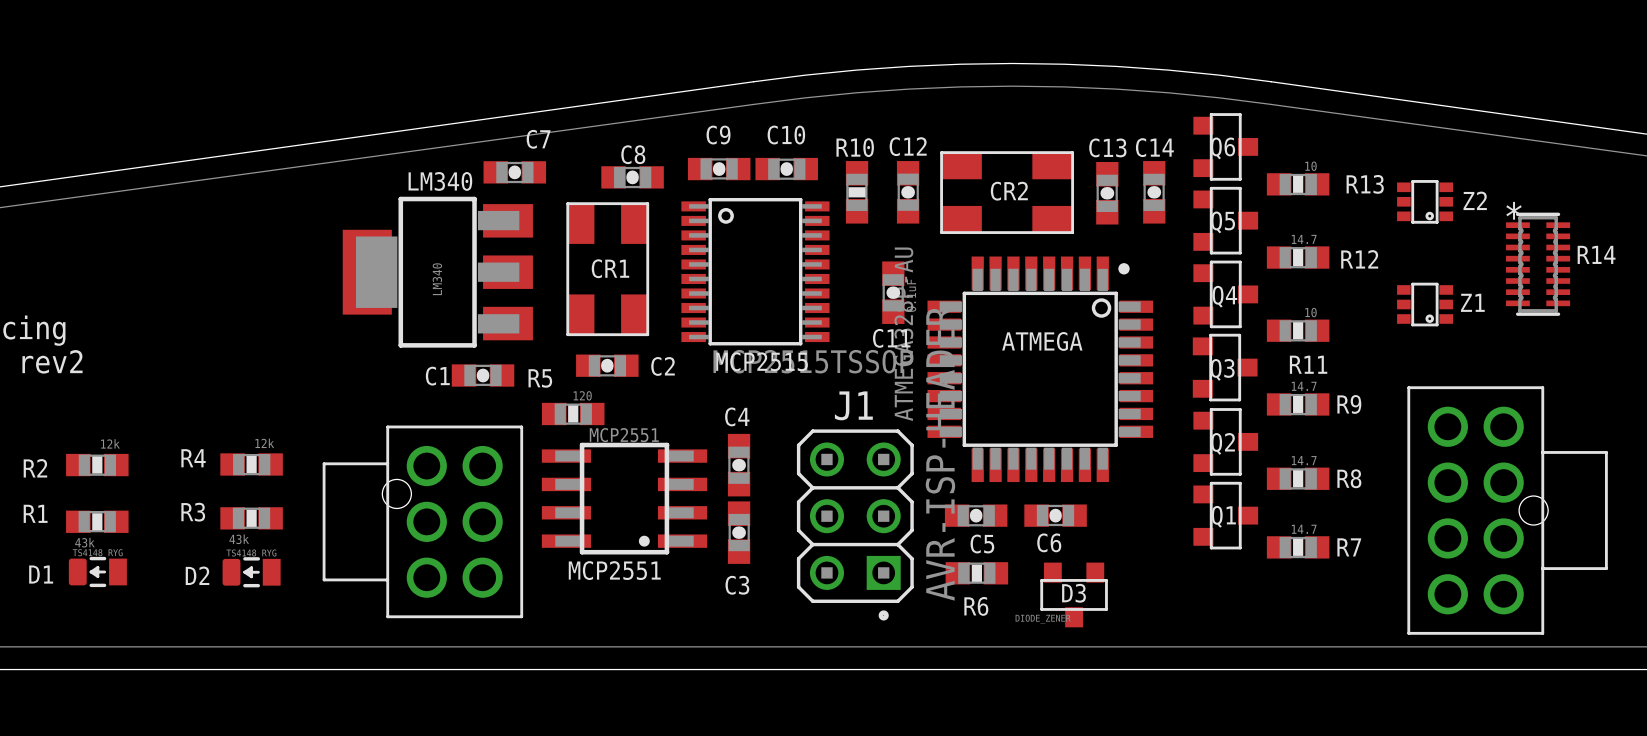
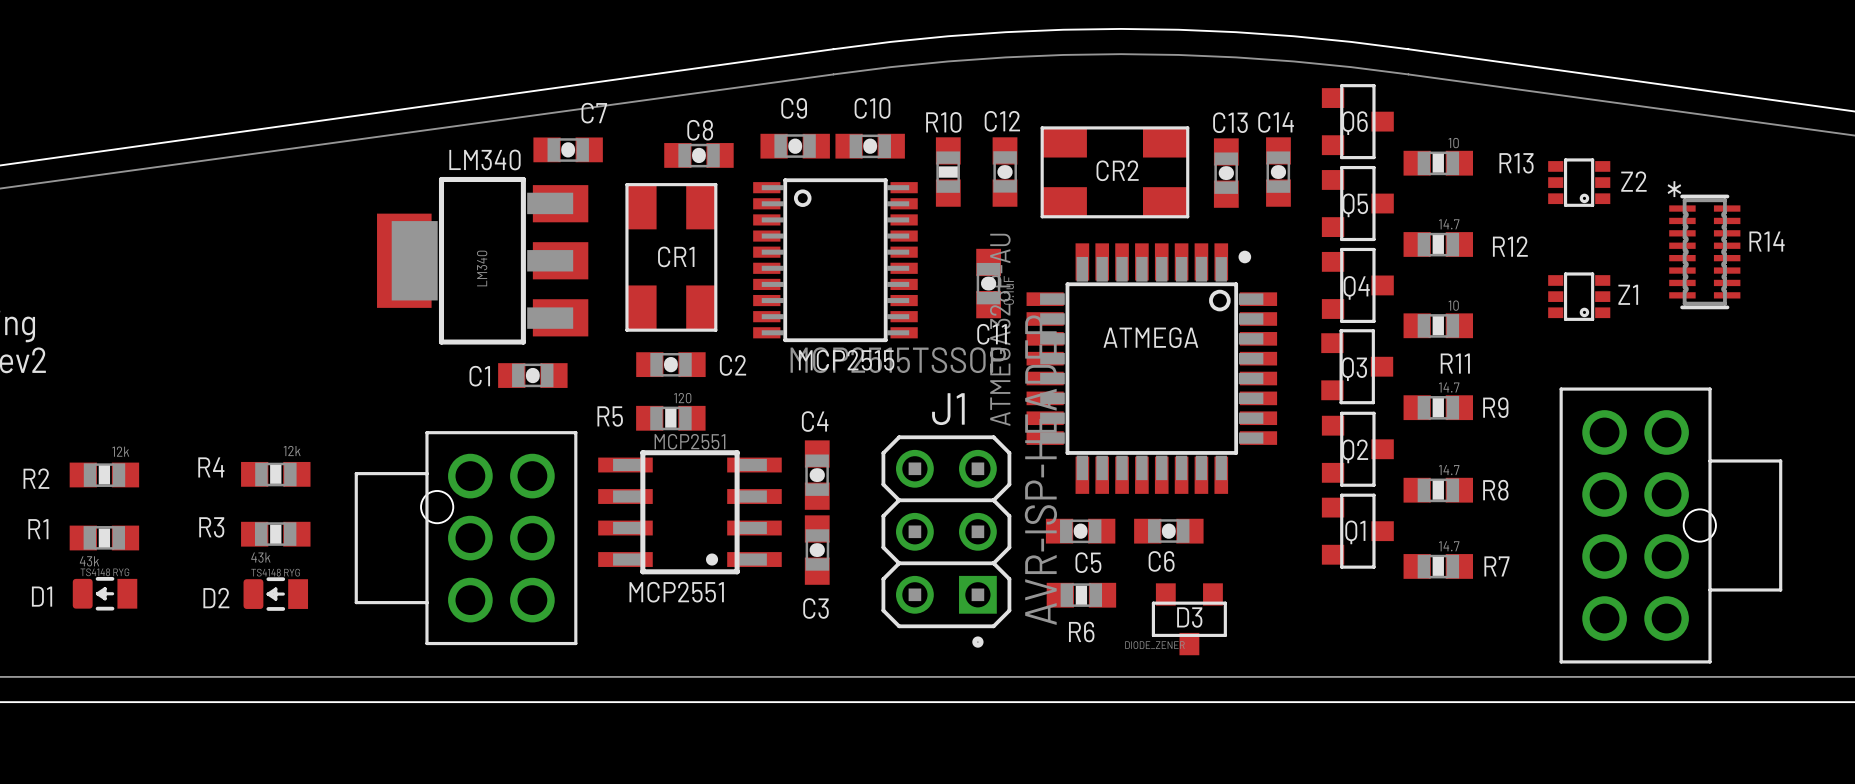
R5 name position: R5 (540, 378) -> R5 (610, 416)
R5 position: (573, 414) -> (670, 418)

